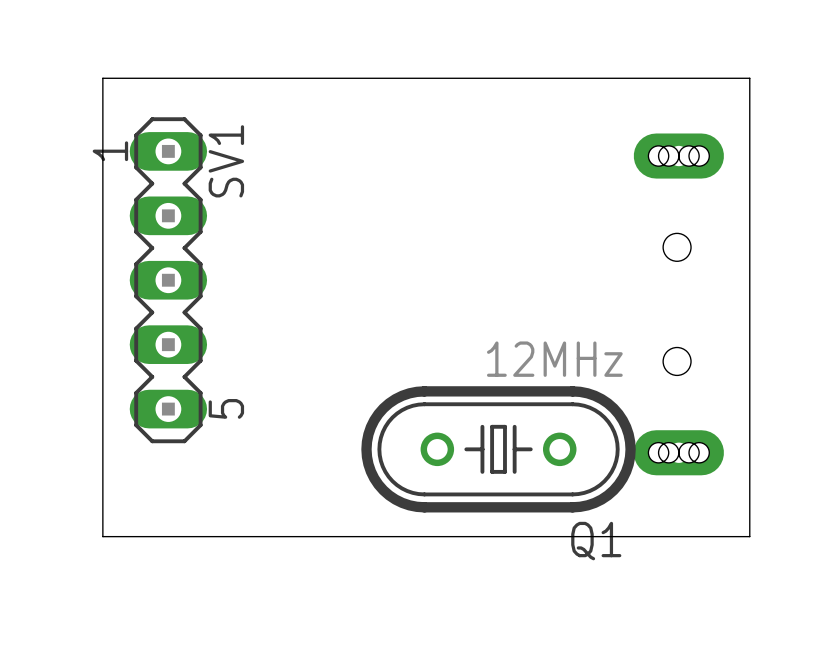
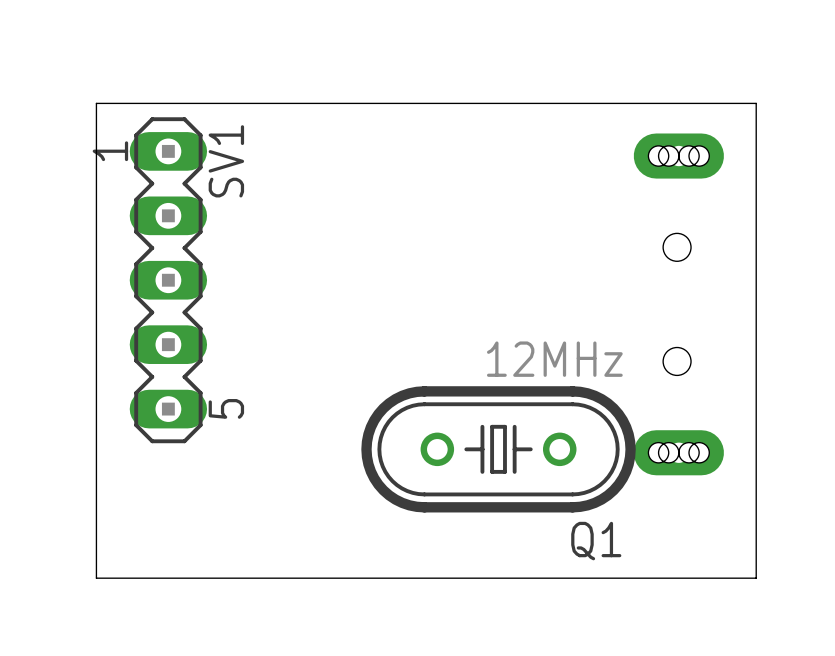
board edge: (749, 78) (102, 78) (102, 536) (749, 536) (749, 78) -> (756, 103) (756, 578) (96, 578) (96, 103) (756, 103)

